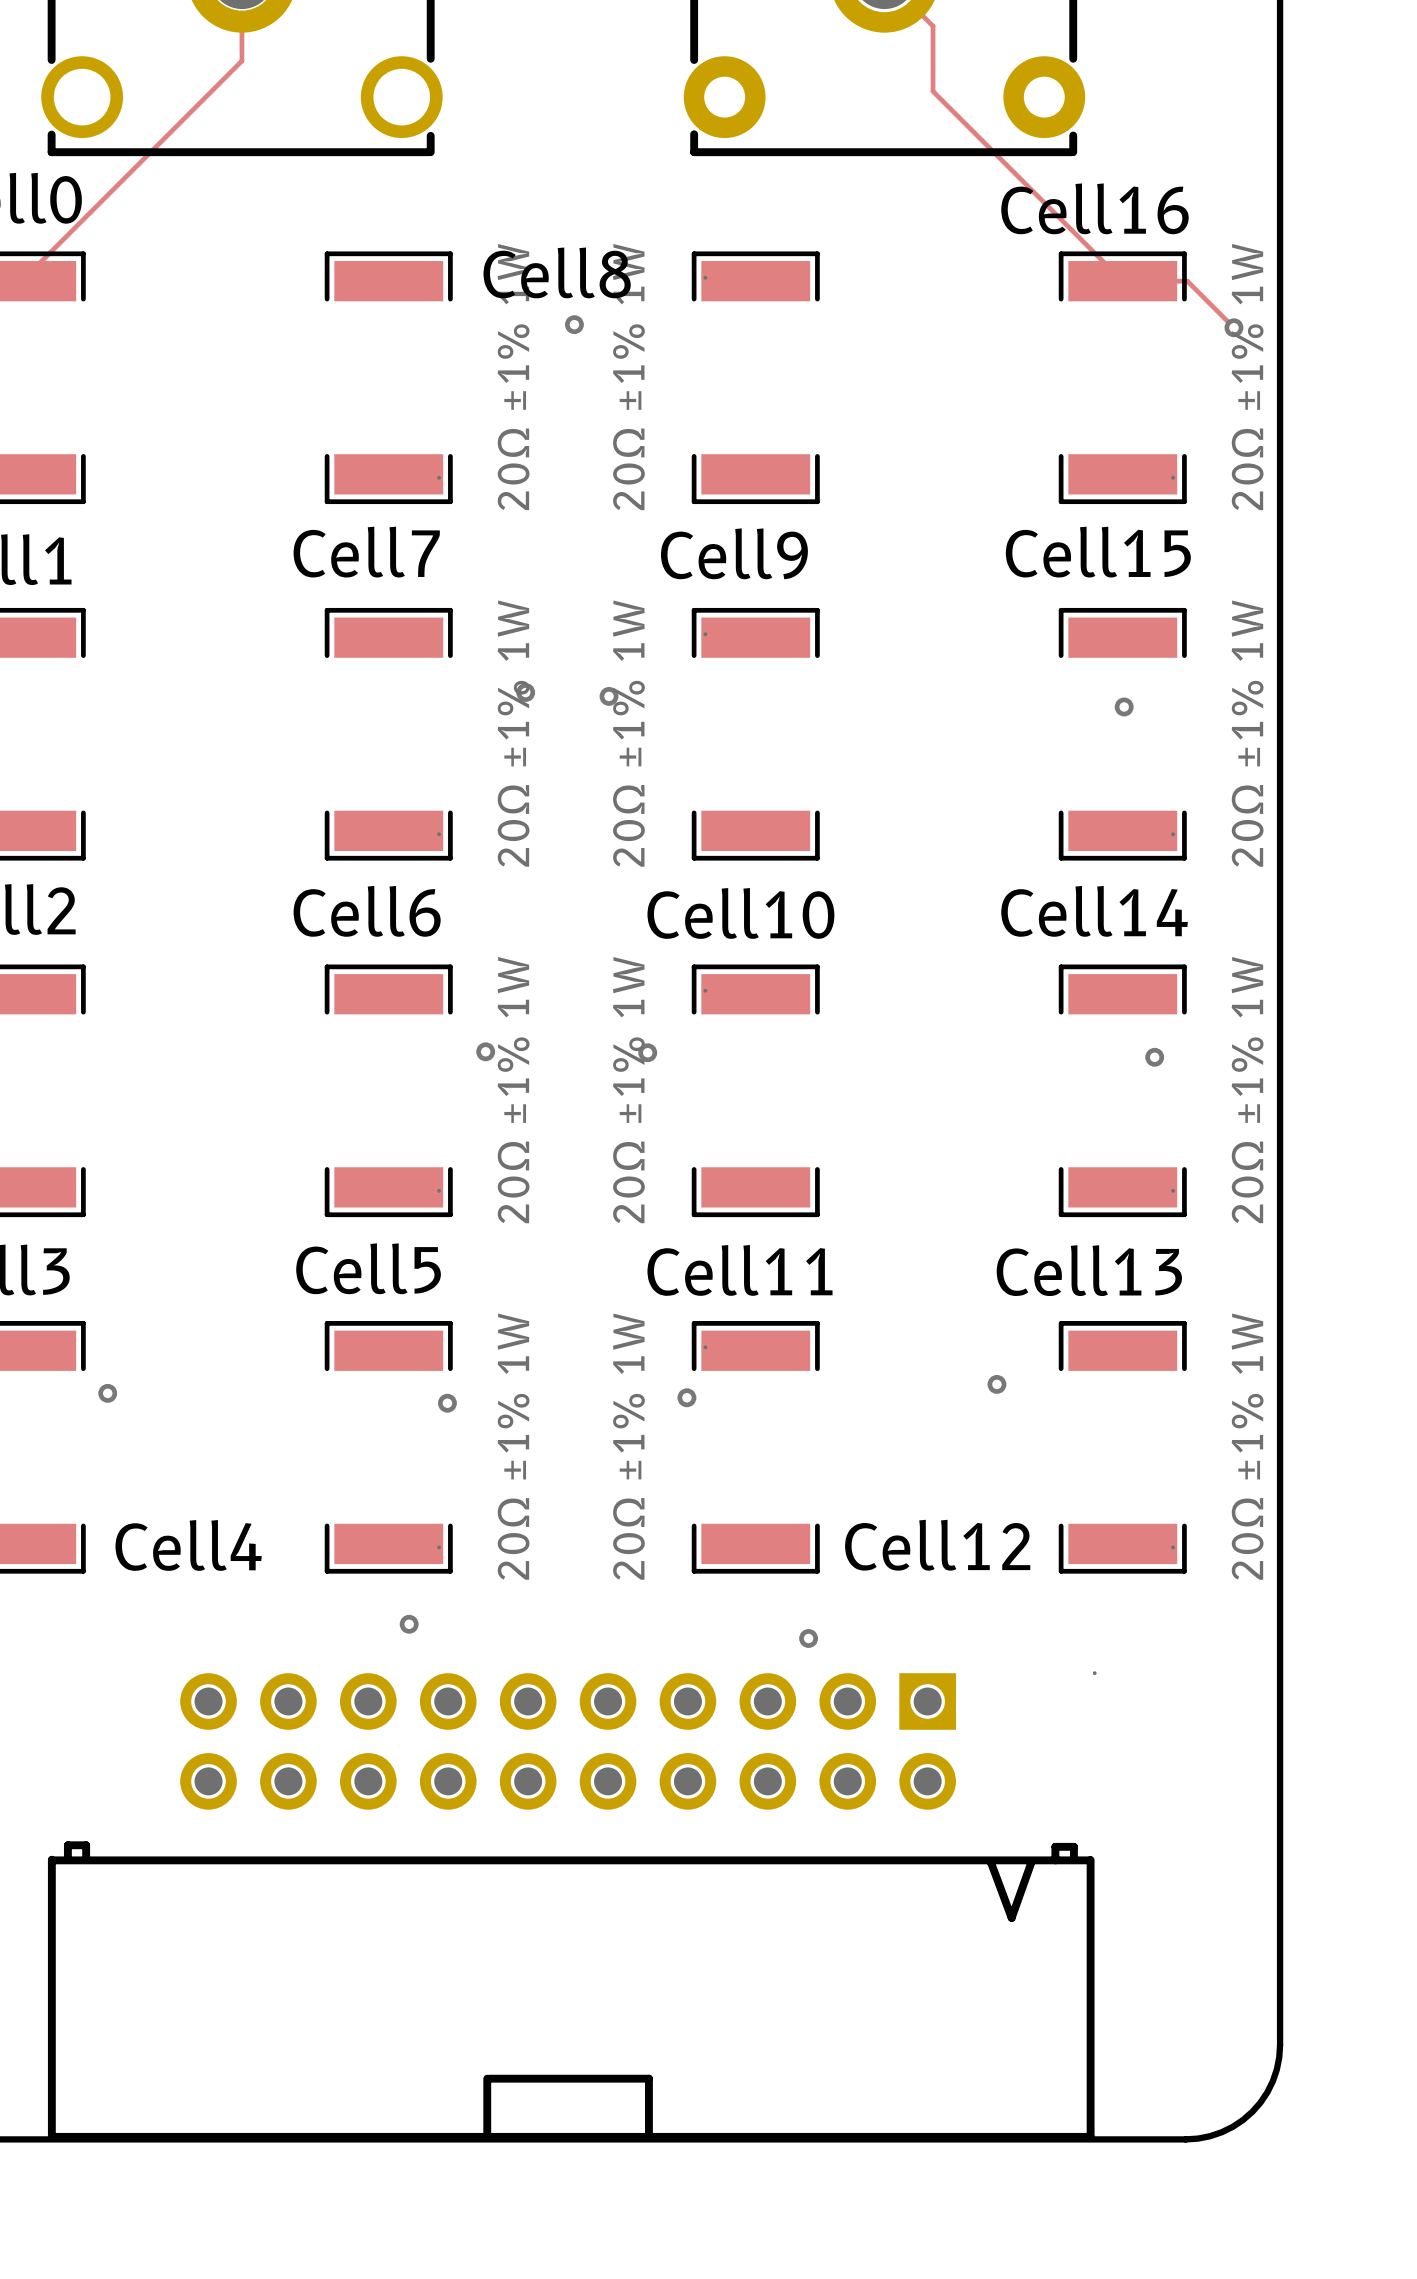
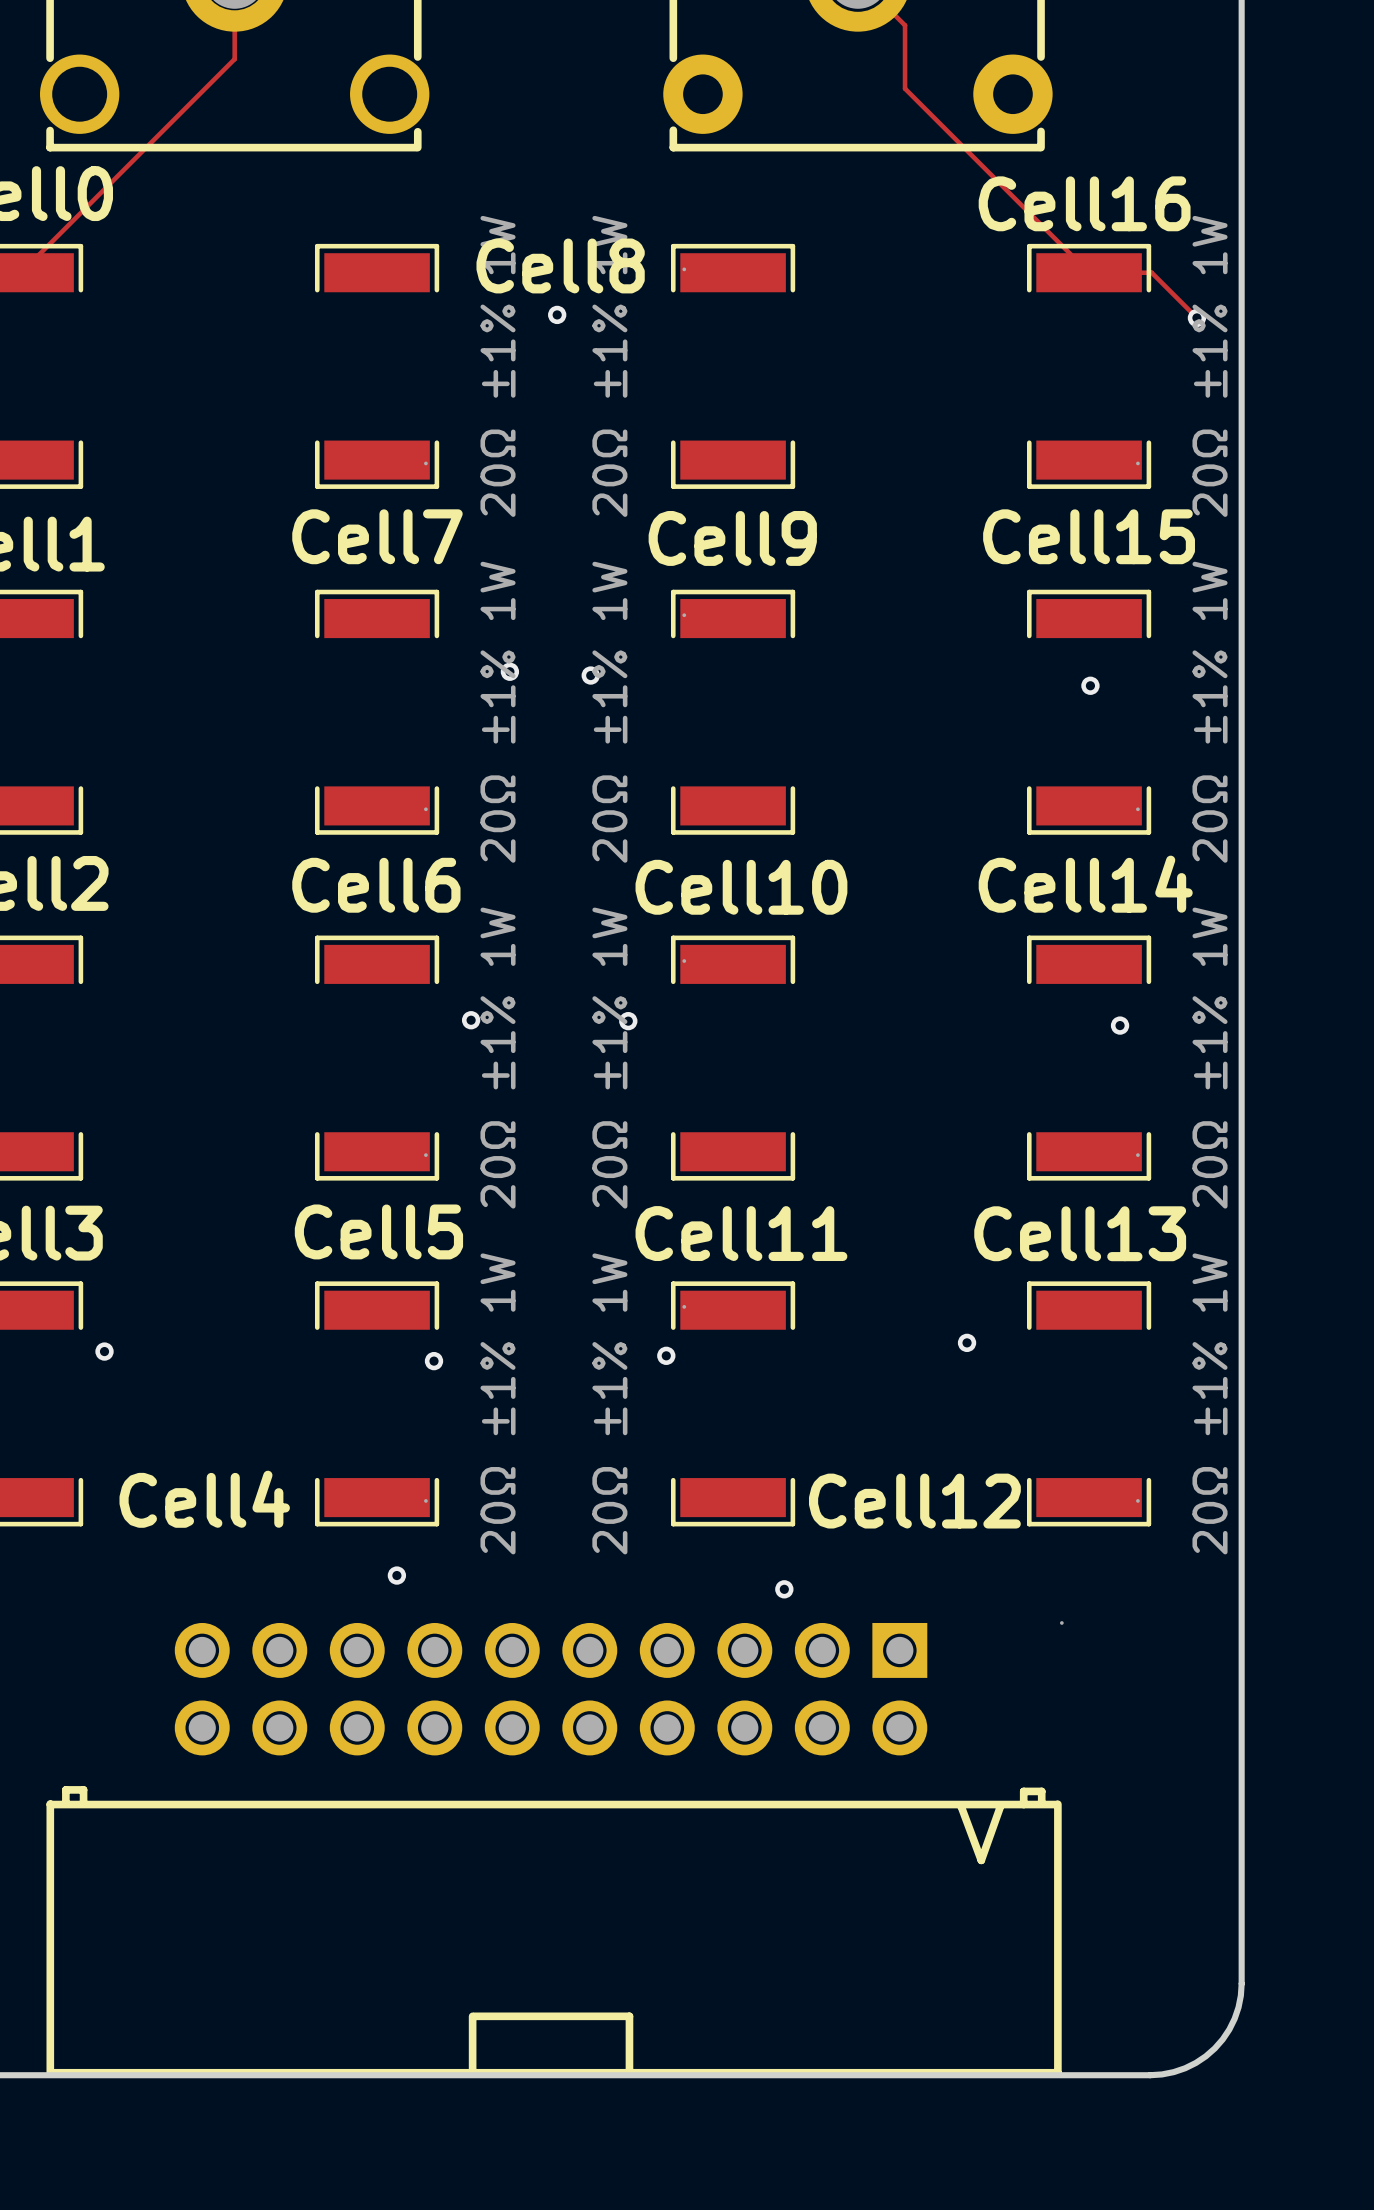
text position: Cell12 (937, 1545) -> Cell12 (914, 1501)

